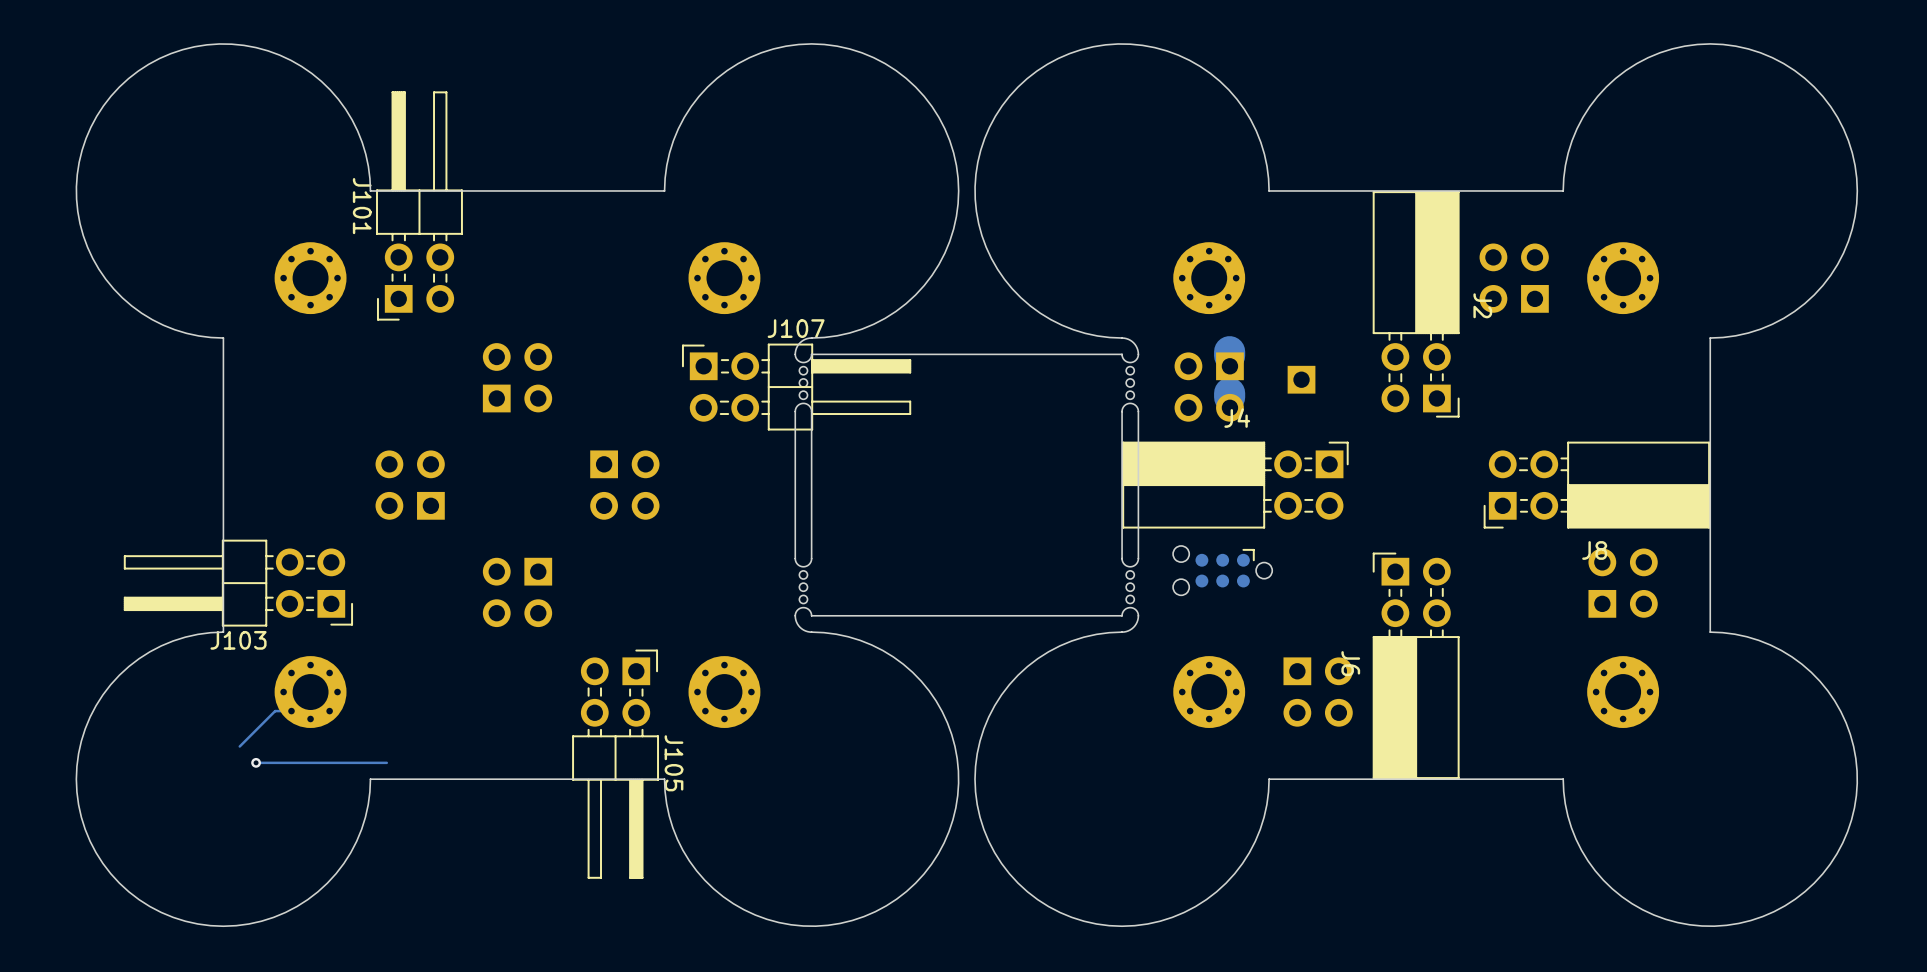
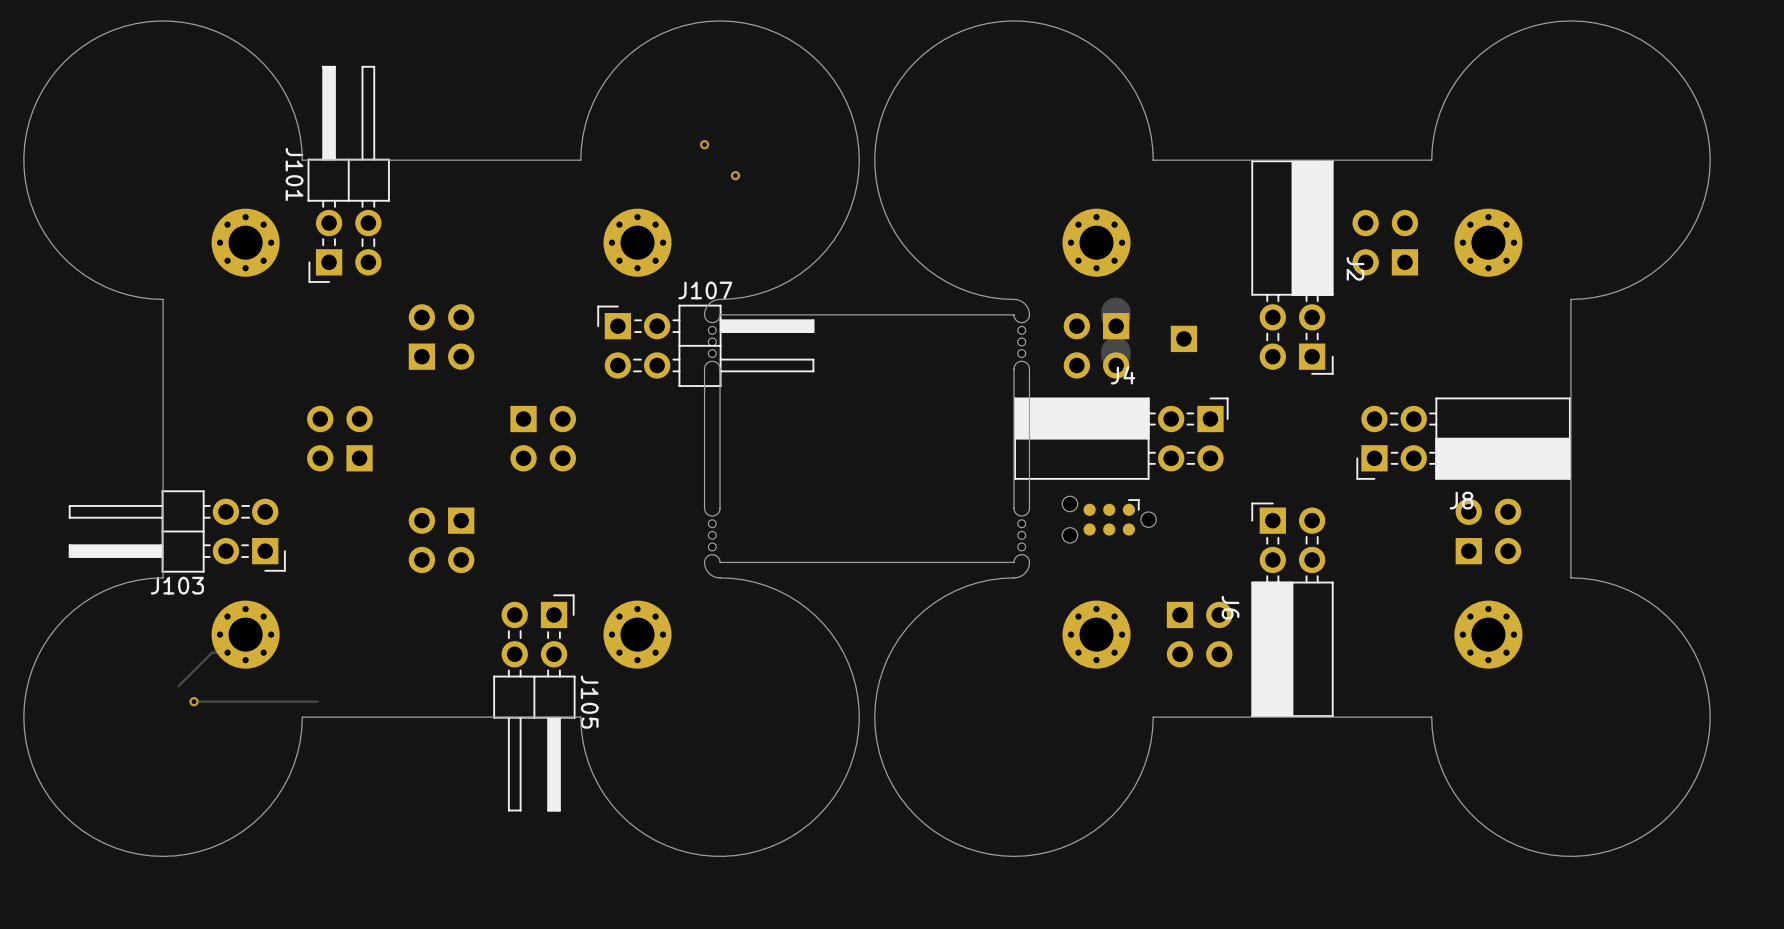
via: none -> (704, 144)
via: none -> (735, 175)

